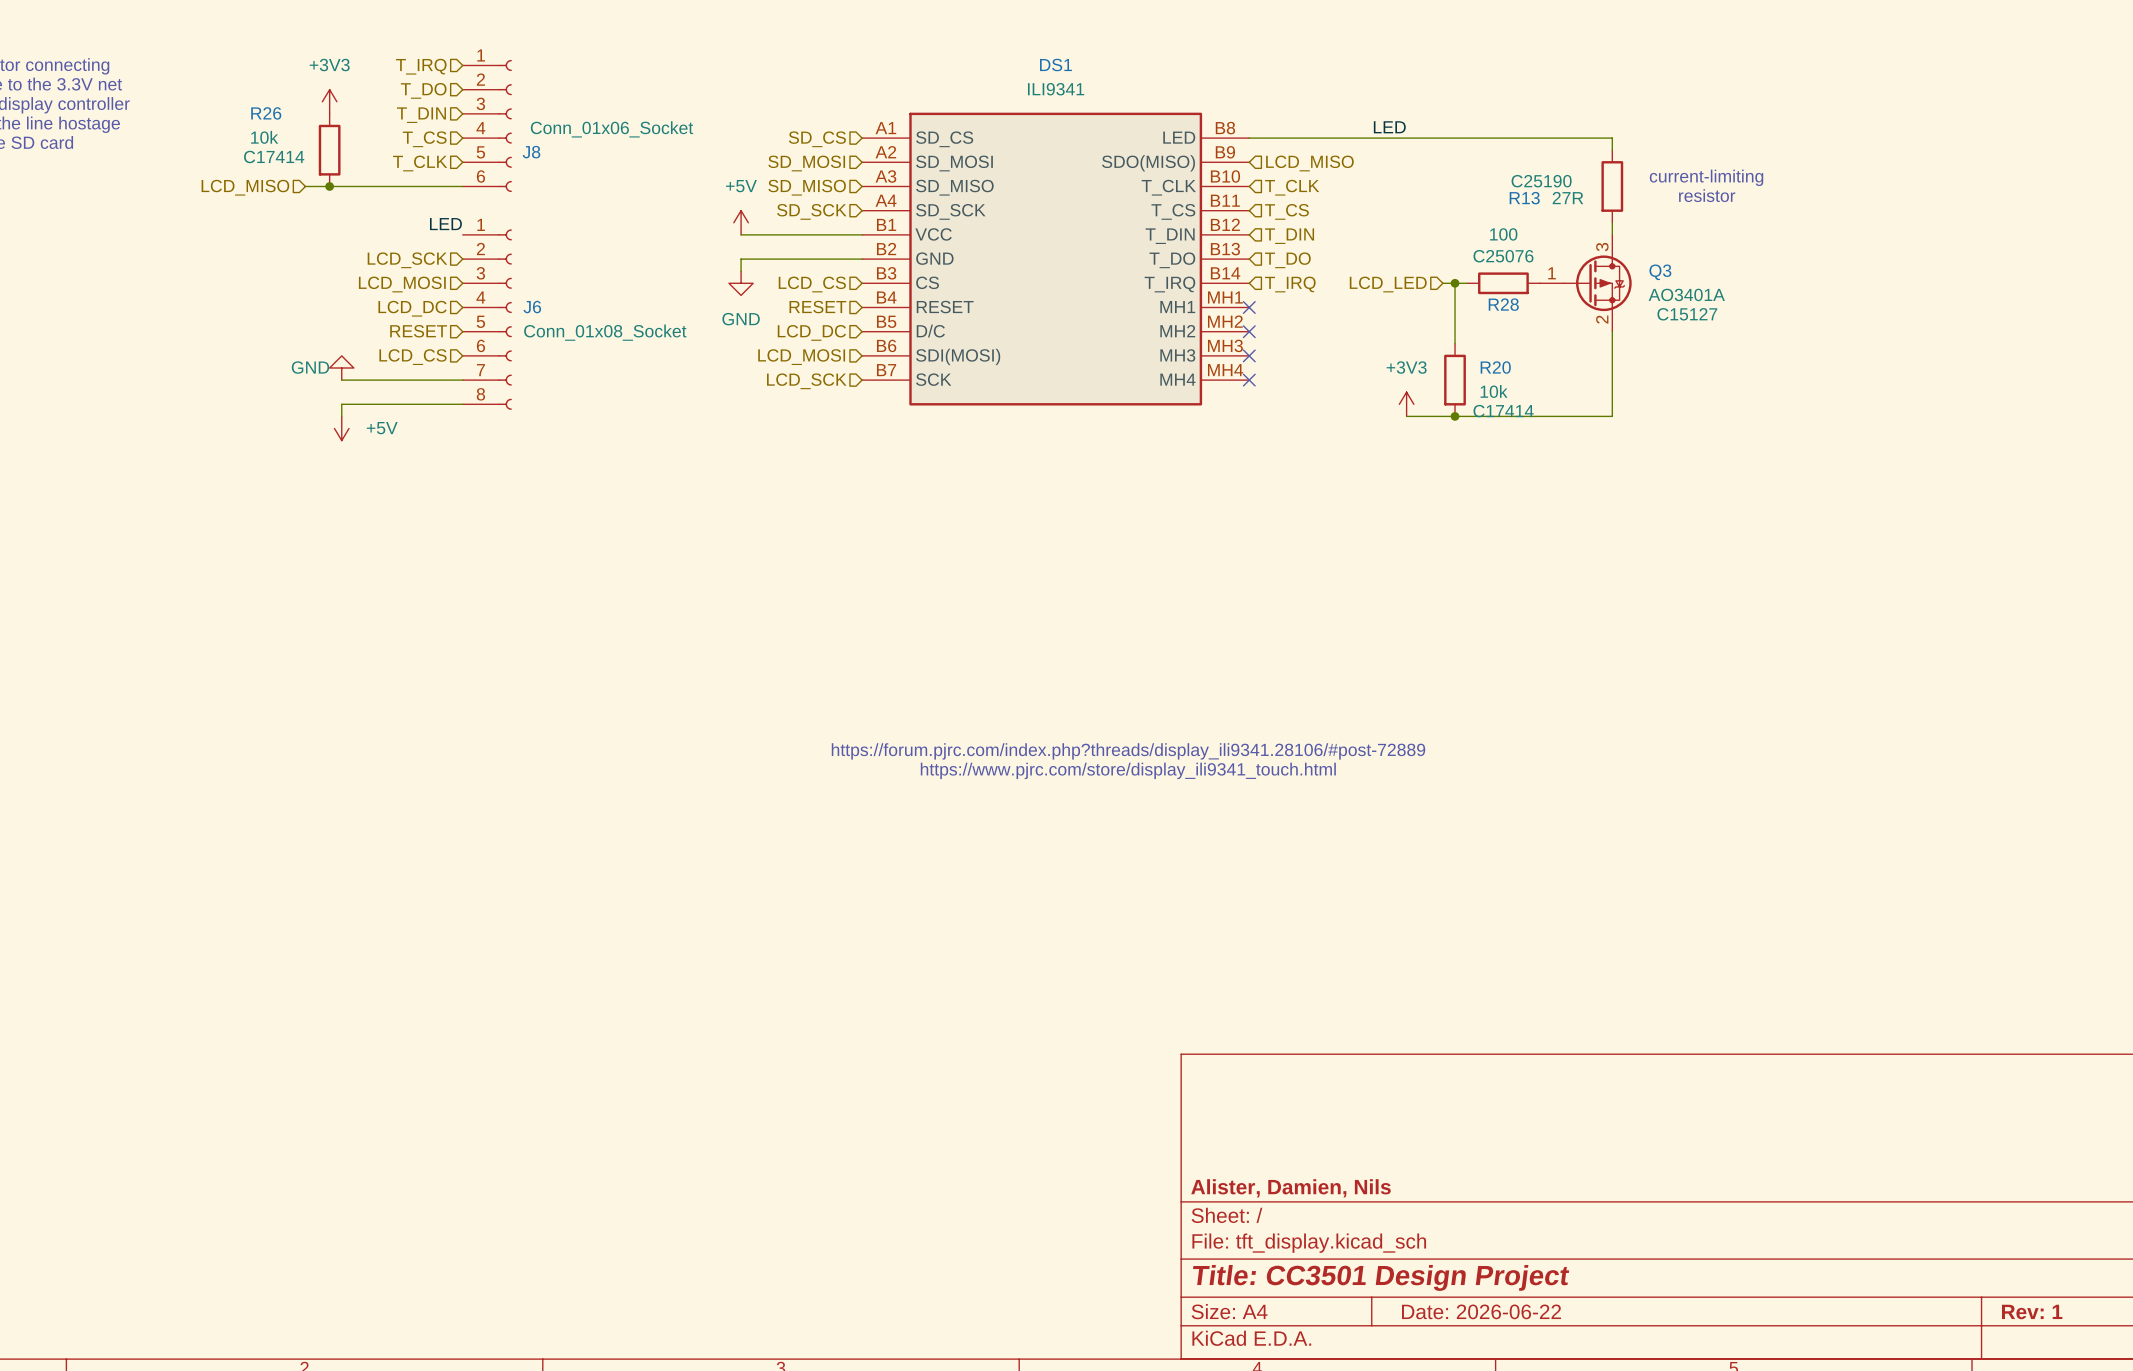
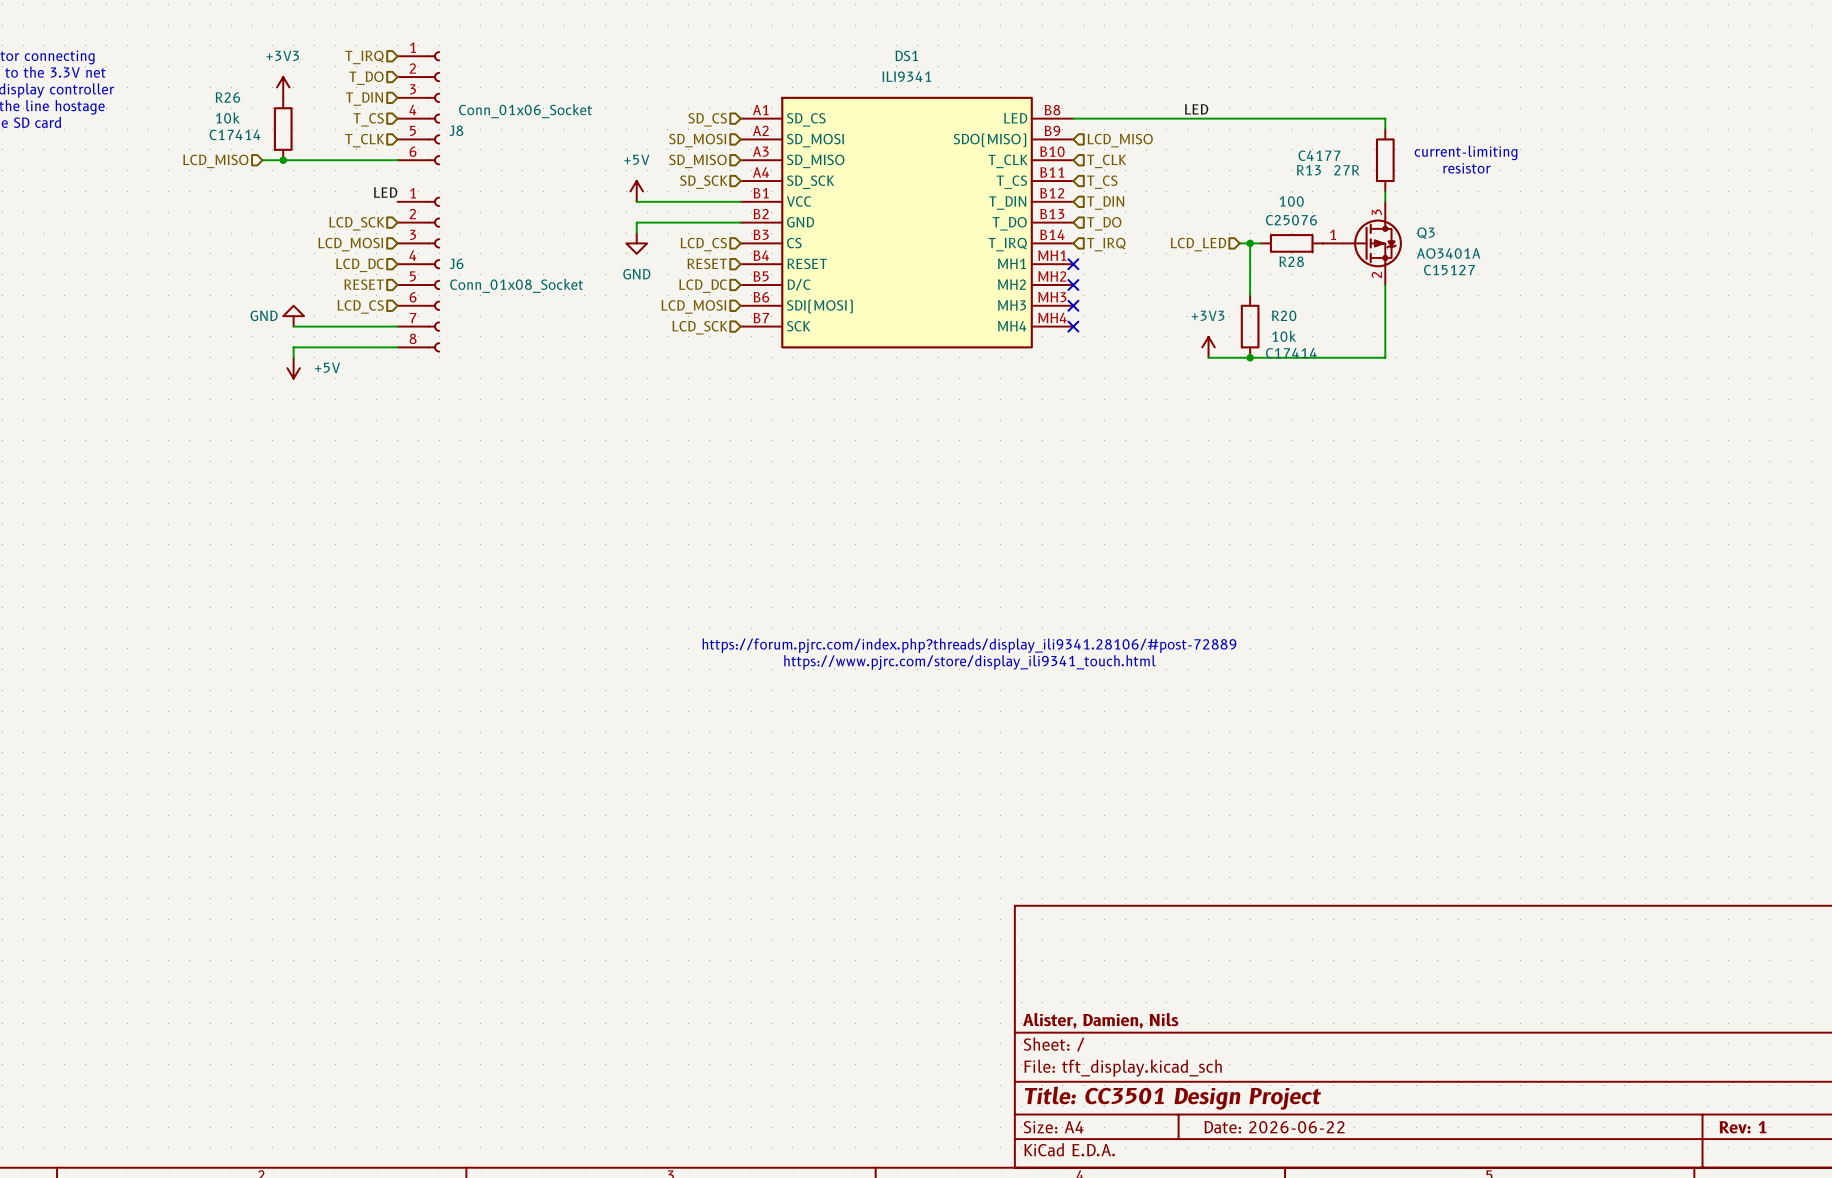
R13 text: C25190 (1541, 181) -> C4177 (1319, 155)

